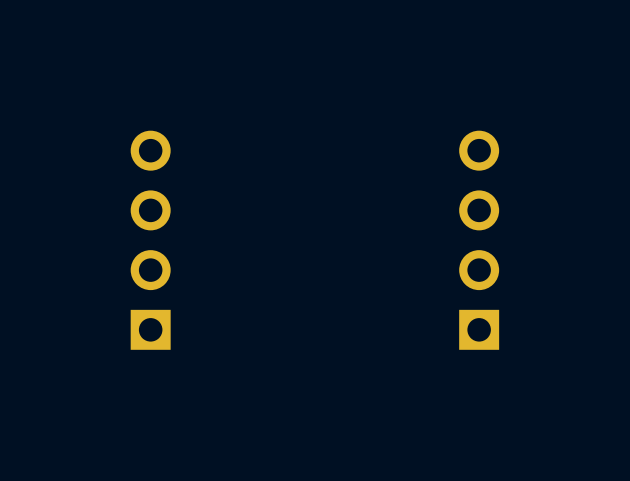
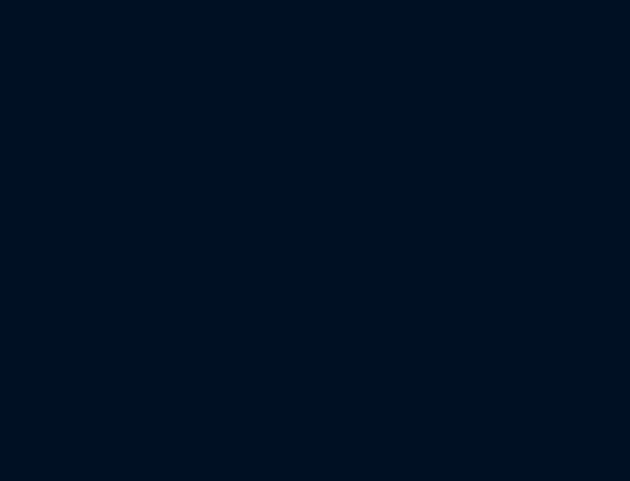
part: (150, 240) -> none
part: (479, 240) -> none

